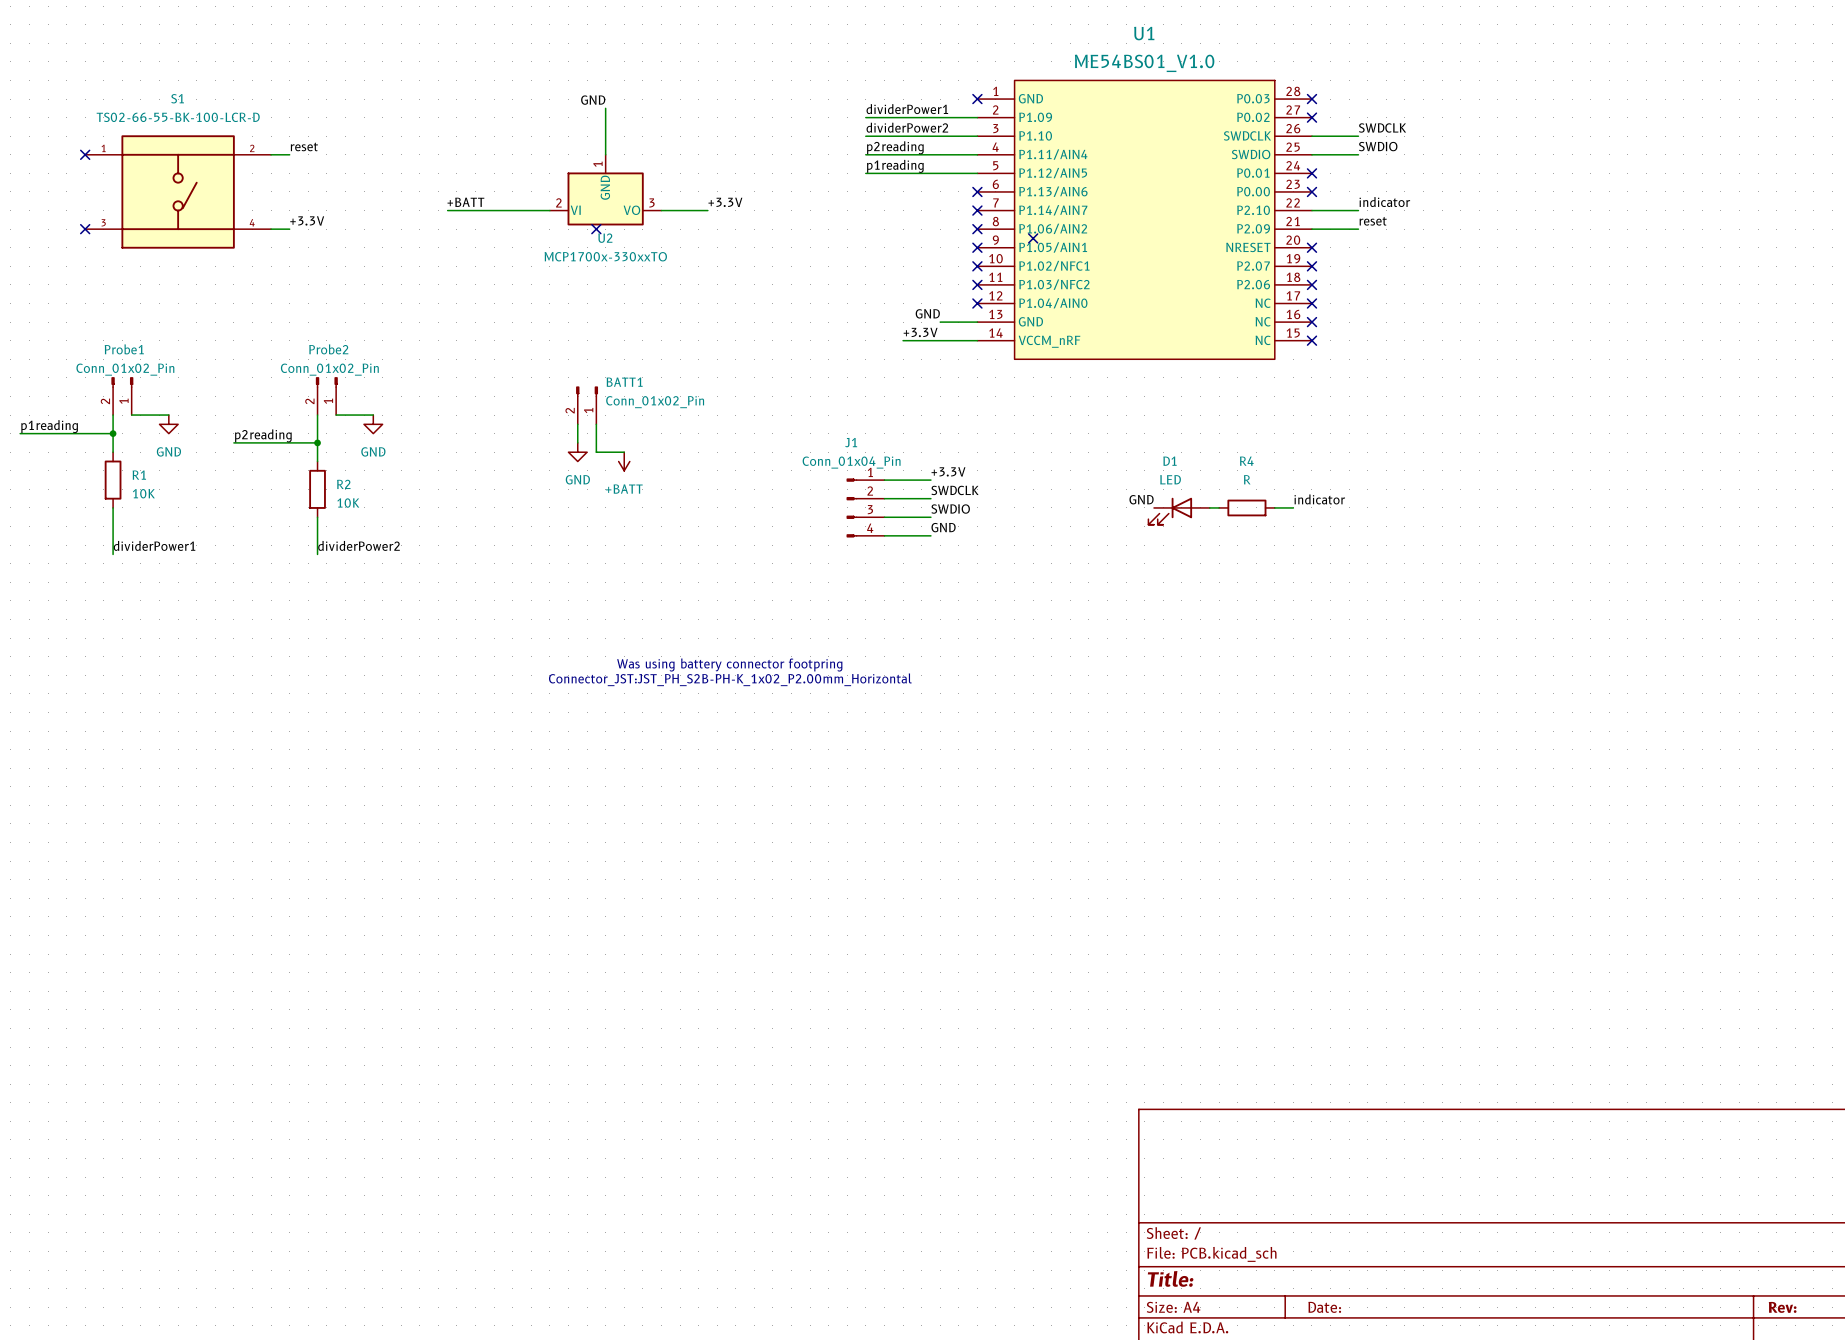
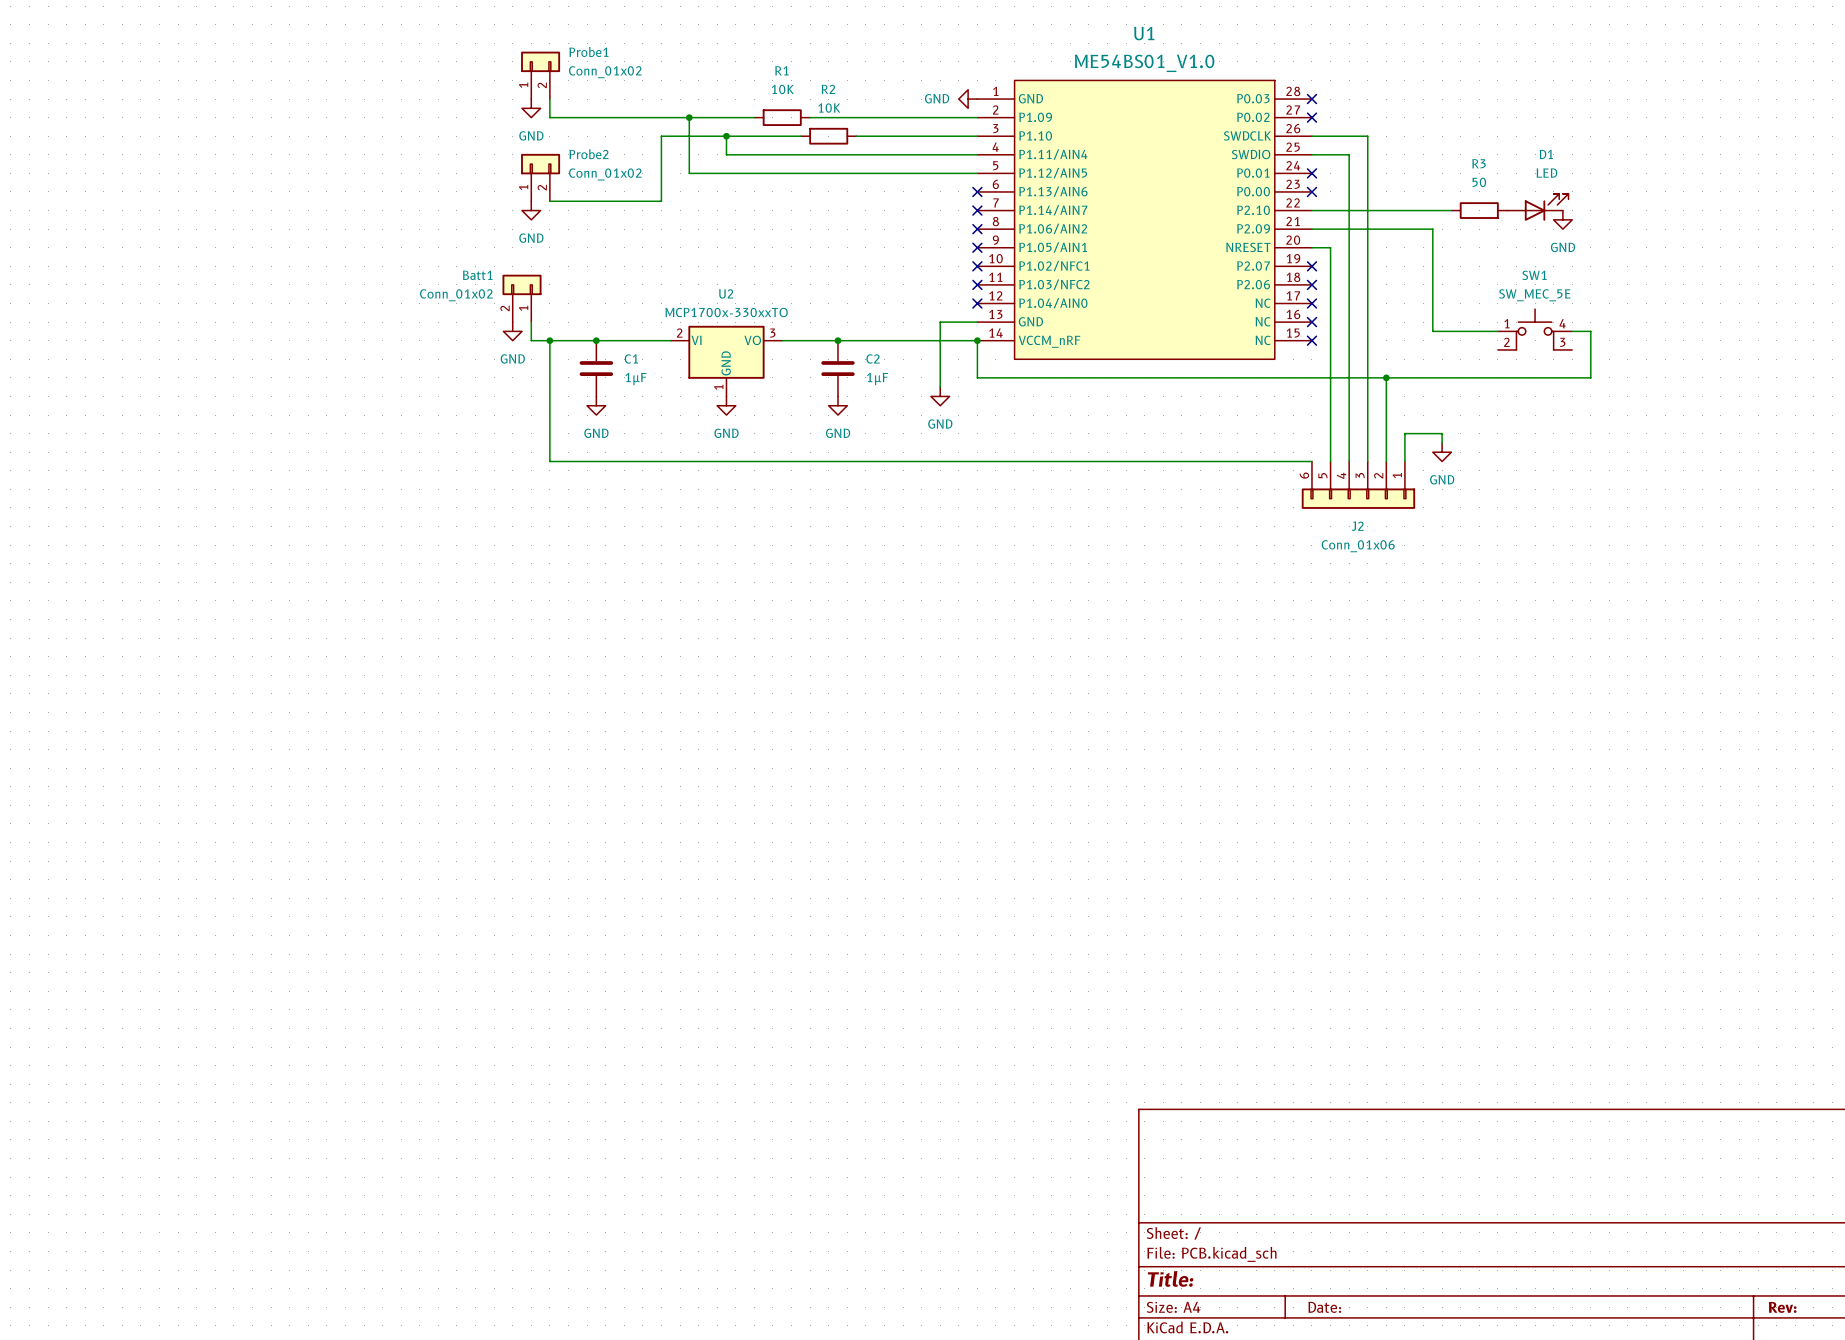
wire: none -> (549, 99) (549, 117) (754, 117)
power symbol: none -> GND (968, 99)
no-connect mark: (977, 99) -> none
label: GND (593, 100) -> none
power symbol: none -> GND (531, 108)
wire: (605, 108) (605, 154) -> none
label: dividerPower1 (907, 109) -> none
wire: none -> (689, 117) (689, 173) (865, 173)
junction: none -> (689, 117)
wire: none -> (810, 117) (865, 117)
label: dividerPower2 (907, 127) -> none
label: SWDCLK (1382, 127) -> none
wire: none -> (726, 136) (726, 154) (865, 154)
junction: none -> (726, 136)
wire: none -> (800, 136) (661, 136) (661, 201) (549, 201)
wire: none -> (856, 136) (865, 136)
wire: none -> (1358, 136) (1367, 136) (1367, 461)
label: reset (304, 146) -> none
label: SWDIO (1378, 146) -> none
label: p2reading (895, 147) -> none
no-connect mark: (85, 154) -> none
wire: (271, 154) (289, 154) -> none
wire: (1349, 154) (1358, 154) -> (1349, 154) (1349, 461)
label: p1reading (895, 166) -> none
U2 position: (605, 190) -> (726, 361)
S1: TS02-66-55-BK-100-LCR-D (178, 191) -> none
U2 flip: as is (605, 198) -> up-down (726, 352)
label: +BATT (465, 202) -> none
label: +3.3V (725, 202) -> none
label: indicator (1384, 202) -> none
wire: (447, 210) (549, 210) -> none
power symbol: none -> GND (531, 210)
wire: (661, 210) (707, 210) -> none
wire: none -> (1358, 210) (1451, 210)
R3: none -> 50 (1479, 210)
power symbol: none -> GND (1562, 219)
label: +3.3V (307, 220) -> none
label: reset (1373, 221) -> none
no-connect mark: (85, 229) -> none
wire: (271, 229) (289, 229) -> none
no-connect mark: (596, 229) -> none
wire: none -> (1358, 229) (1432, 229) (1432, 331) (1497, 331)
U2 name position: U2 (605, 238) -> U2 (726, 293)
no-connect mark: (1033, 238) -> none
wire: none -> (1311, 247) (1330, 247) (1330, 461)
no-connect mark: (1311, 247) -> none
U2 value position: MCP1700x-330xxTO (605, 256) -> MCP1700x-330xxTO (726, 312)
Batt1: none -> Conn_01x02 (522, 298)
label: GND (927, 313) -> none
wire: none -> (531, 322) (531, 340) (670, 340)
wire: none -> (940, 322) (940, 387)
SW1: none -> SW_MEC_5E (1535, 329)
power symbol: none -> GND (512, 331)
wire: none -> (1572, 331) (1590, 331) (1590, 377) (977, 377) (977, 340)
label: +3.3V (920, 332) -> none
wire: none -> (549, 340) (549, 461) (1311, 461)
junction: none -> (549, 340)
junction: none -> (596, 340)
wire: none -> (782, 340) (903, 340)
junction: none -> (837, 340)
junction: none -> (977, 340)
Probe1 name position: Probe1 (124, 349) -> Probe1 (588, 51)
Probe2 name position: Probe2 (328, 349) -> Probe2 (588, 154)
C1: none -> 1µF (596, 368)
C2: none -> 1µF (837, 368)
Probe1 value: Conn_01x02_Pin (125, 369) -> Conn_01x02 (605, 72)
Probe2 value: Conn_01x02_Pin (329, 369) -> Conn_01x02 (605, 174)
Probe1 symbol: [111, 377, 134, 416] -> [521, 51, 561, 100]
Probe2 symbol: [316, 377, 338, 416] -> [521, 153, 561, 202]
wire: none -> (1386, 377) (1386, 461)
junction: none -> (1386, 377)
power symbol: none -> GND (940, 396)
BATT1: Conn_01x02_Pin (587, 405) -> none
power symbol: none -> GND (726, 405)
power symbol: none -> GND (837, 405)
wire: (113, 415) (113, 452) -> none
wire: (131, 415) (168, 415) -> none
wire: (317, 415) (317, 461) -> none
wire: (336, 415) (373, 415) -> none
power symbol: GND (168, 424) -> none
power symbol: GND (373, 424) -> none
wire: (577, 424) (577, 442) -> none
wire: (596, 424) (596, 452) (624, 452) -> none
label: p1reading (49, 426) -> none
wire: (20, 433) (113, 433) -> none
junction: (113, 433) -> none
label: p2reading (263, 435) -> none
wire: (233, 442) (317, 442) -> none
junction: (317, 442) -> none
wire: none -> (1442, 442) (1442, 433) (1404, 433) (1404, 461)
power symbol position: GND (577, 452) -> GND (596, 405)
power symbol: none -> GND (1442, 452)
power symbol: +BATT (624, 461) -> none
D1 name position: D1 (1170, 461) -> D1 (1546, 154)
label: +3.3V (948, 471) -> none
R1 name position: R1 (139, 475) -> R1 (781, 70)
D1 value position: LED (1170, 479) -> LED (1546, 173)
R1 rotation: 0° (113, 480) -> 90° clockwise (782, 117)
R1 position: (113, 480) -> (782, 117)
wire: (884, 480) (930, 480) -> none
R2 name position: R2 (343, 484) -> R2 (828, 89)
J2: none -> Conn_01x06 (1358, 485)
R2 rotation: 0° (317, 489) -> 90° clockwise (828, 136)
R2 position: (317, 489) -> (828, 136)
label: SWDCLK (955, 490) -> none
R1 value position: 10K (143, 493) -> 10K (782, 89)
wire: (884, 498) (930, 498) -> none
label: GND (1141, 499) -> none
label: indicator (1319, 499) -> none
R2 value position: 10K (348, 503) -> 10K (829, 108)
wire: (113, 507) (113, 554) -> none
J1: Conn_01x04_Pin (865, 507) -> none
wire: (1209, 507) (1219, 507) -> none
R4: R (1246, 507) -> none
wire: (1274, 507) (1293, 507) -> none
label: SWDIO (950, 509) -> none
D1 rotation: 0° (1170, 511) -> 180° (1546, 207)
D1 position: (1179, 511) -> (1537, 207)
wire: (317, 517) (317, 554) -> none
wire: (884, 517) (930, 517) -> none
label: GND (943, 527) -> none
wire: (884, 535) (930, 535) -> none
label: dividerPower1 (154, 545) -> none
label: dividerPower2 (359, 545) -> none
text: Was using battery connector footpring (729, 665) -> none
text: Connector_JST:JST_PH_S2B-PH-K_1x02_P2.00mm_Horizontal (730, 679) -> none

